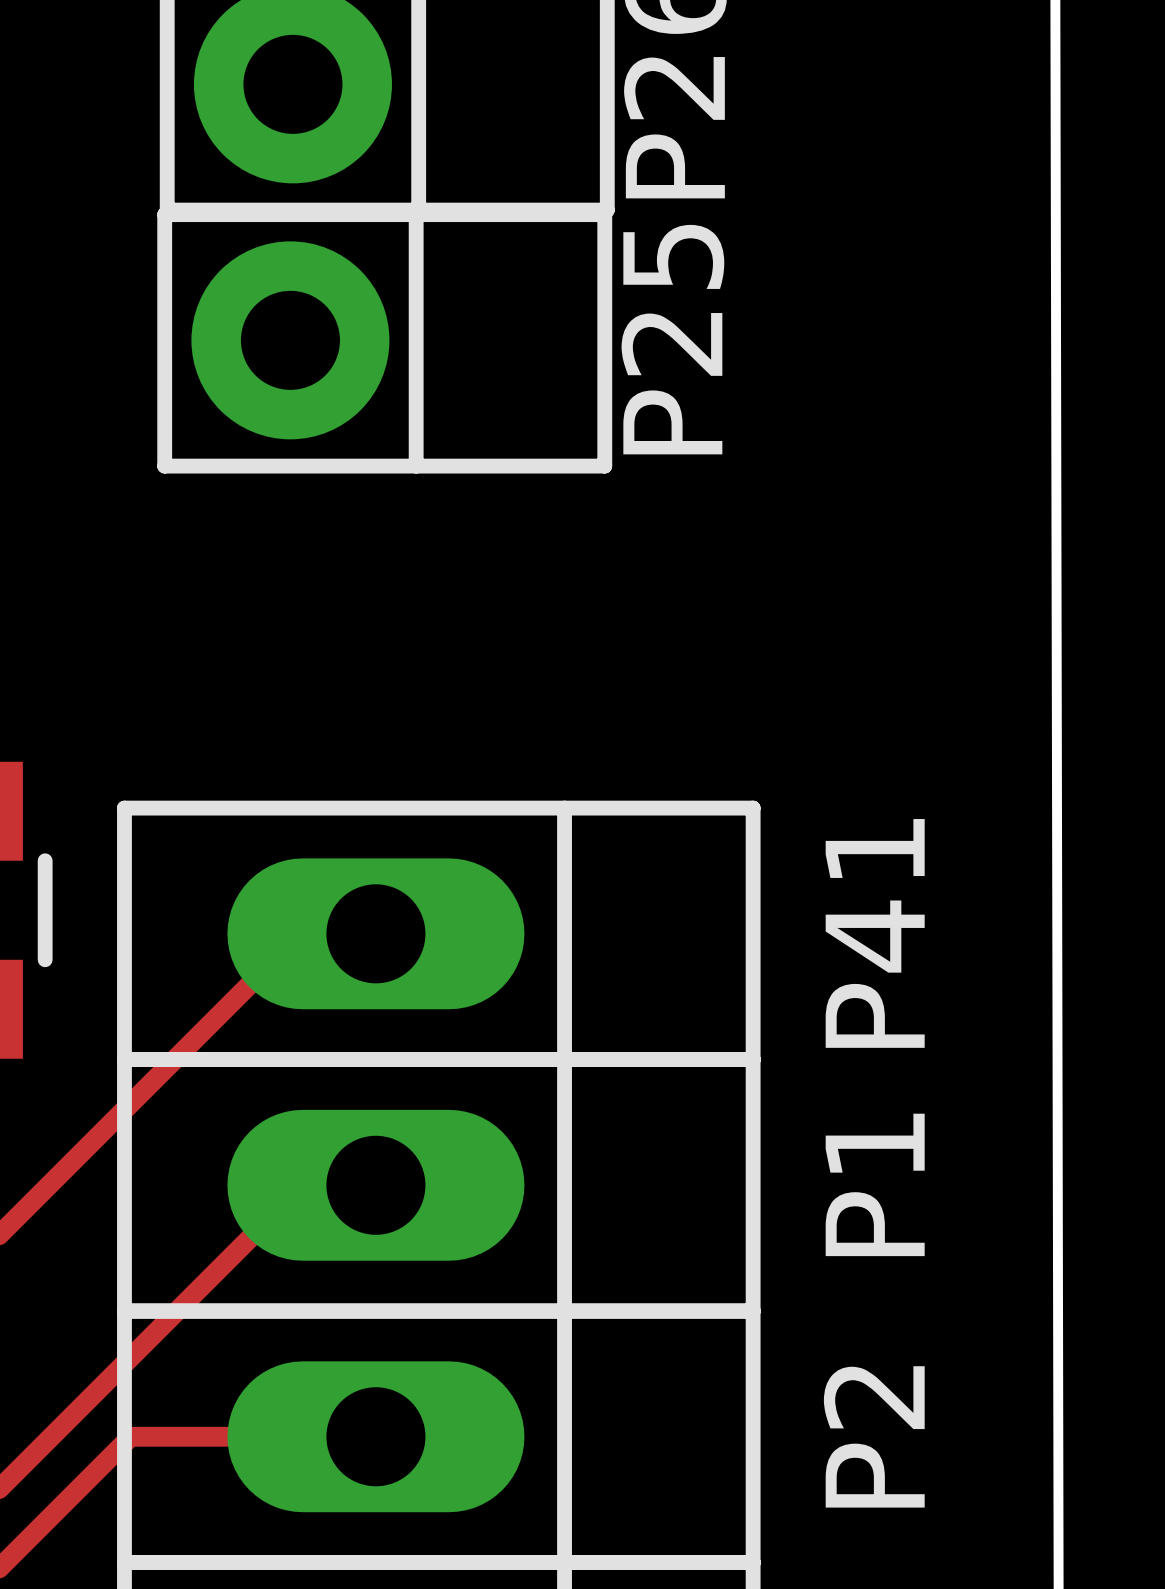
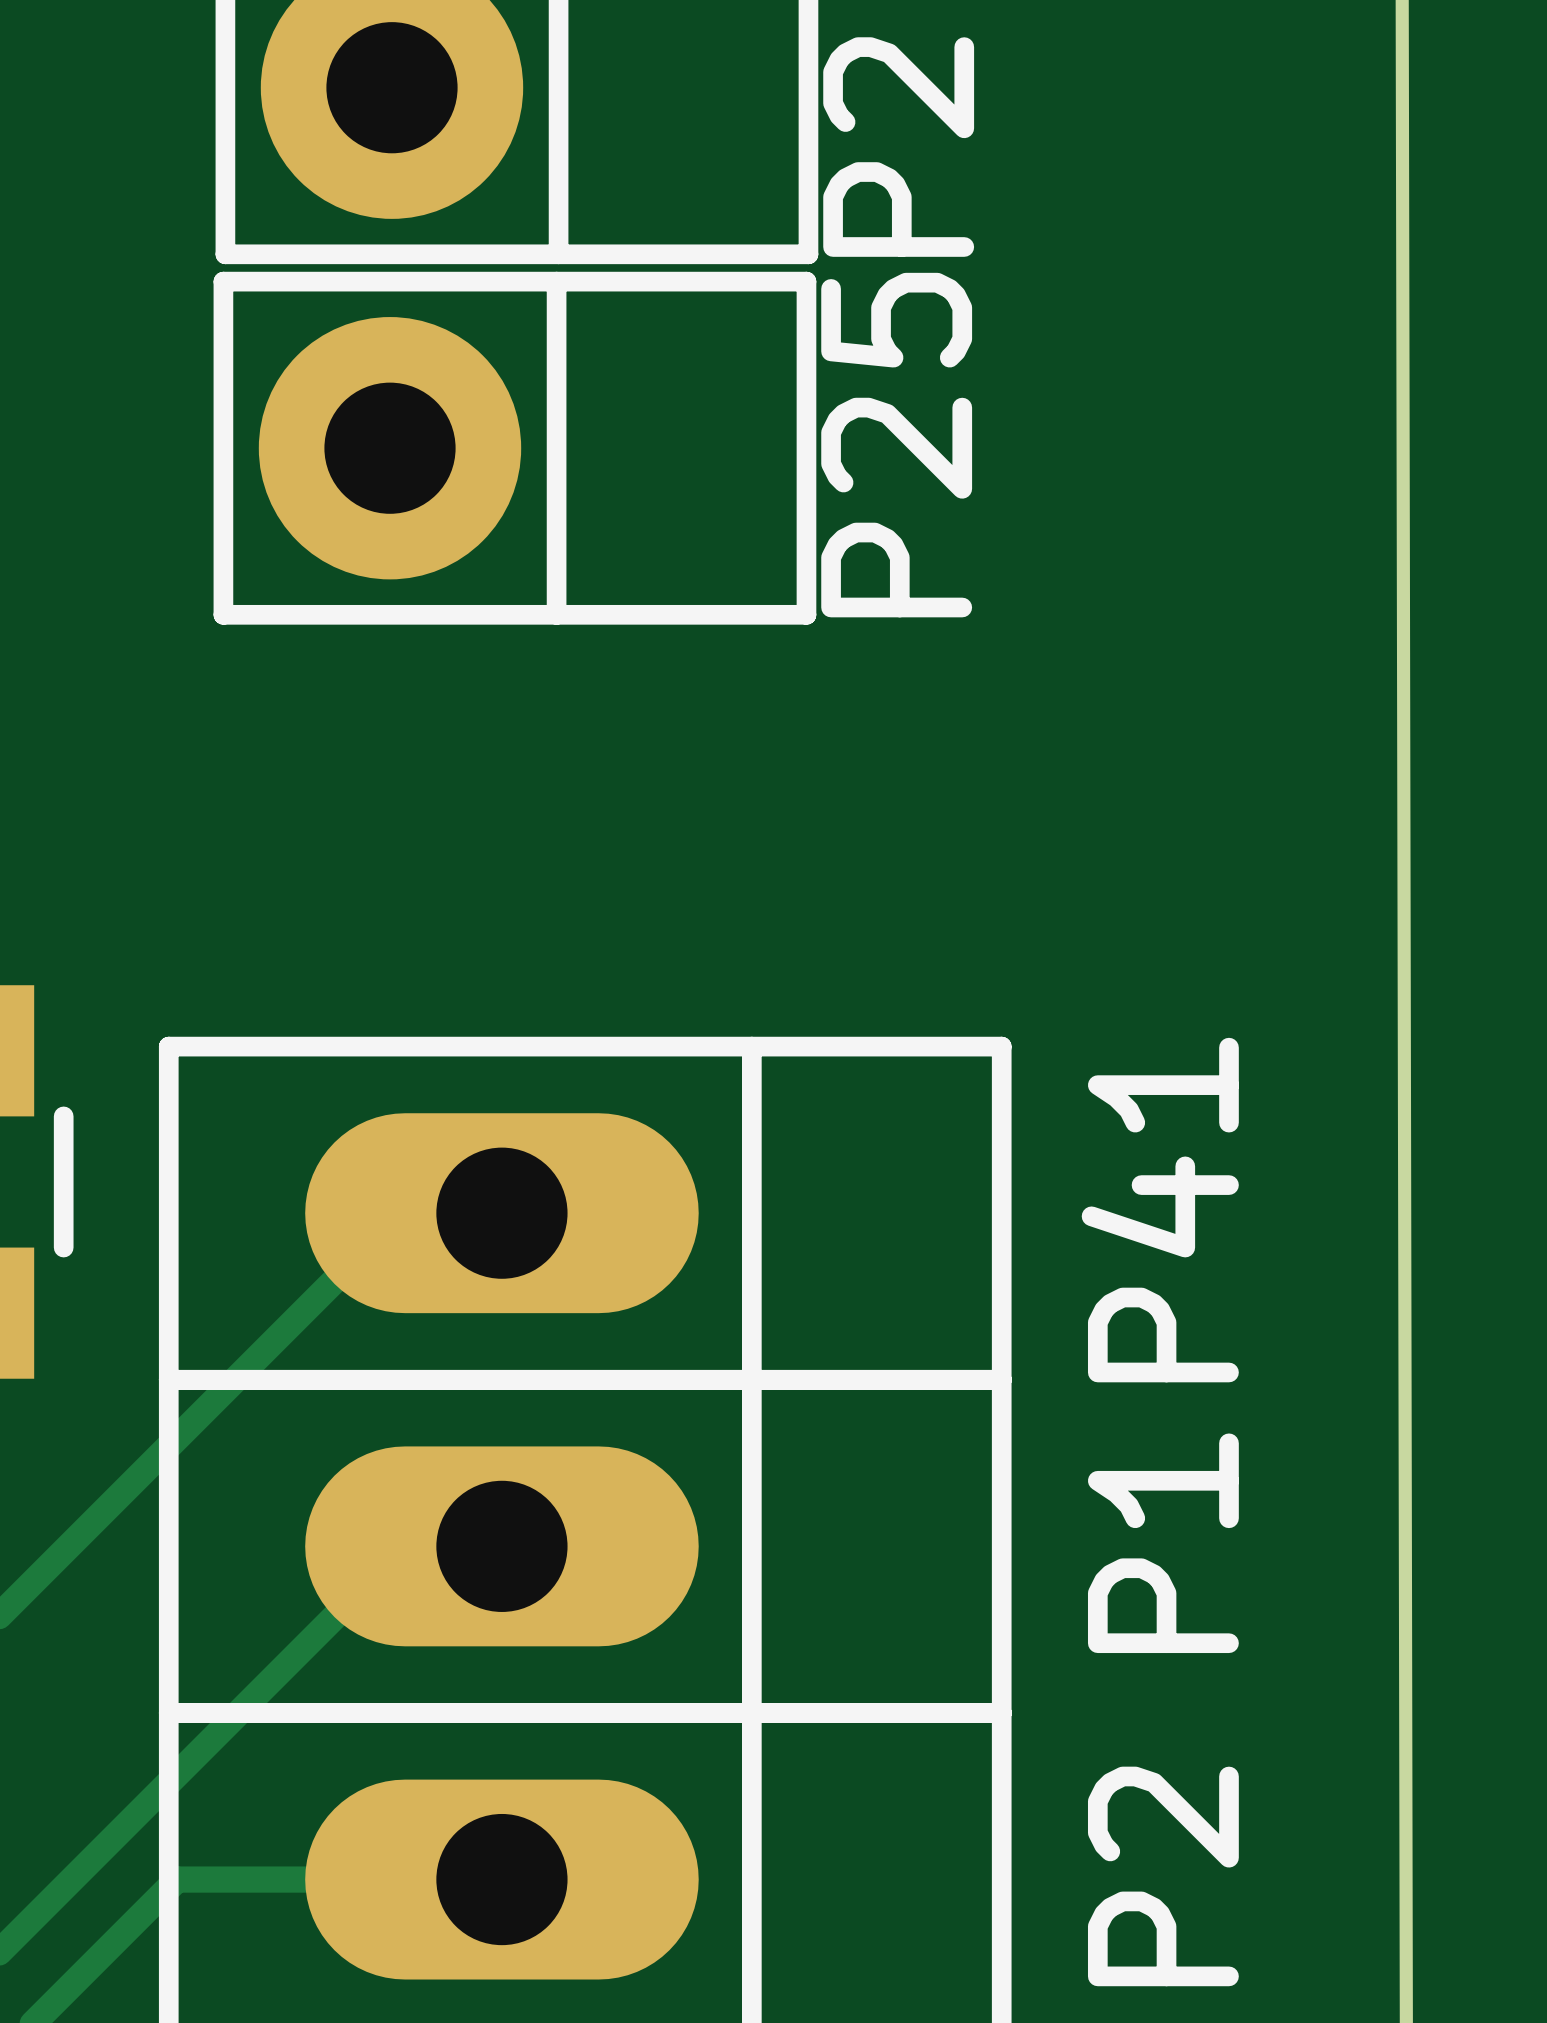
P25 position: (384, 340) -> (514, 448)

